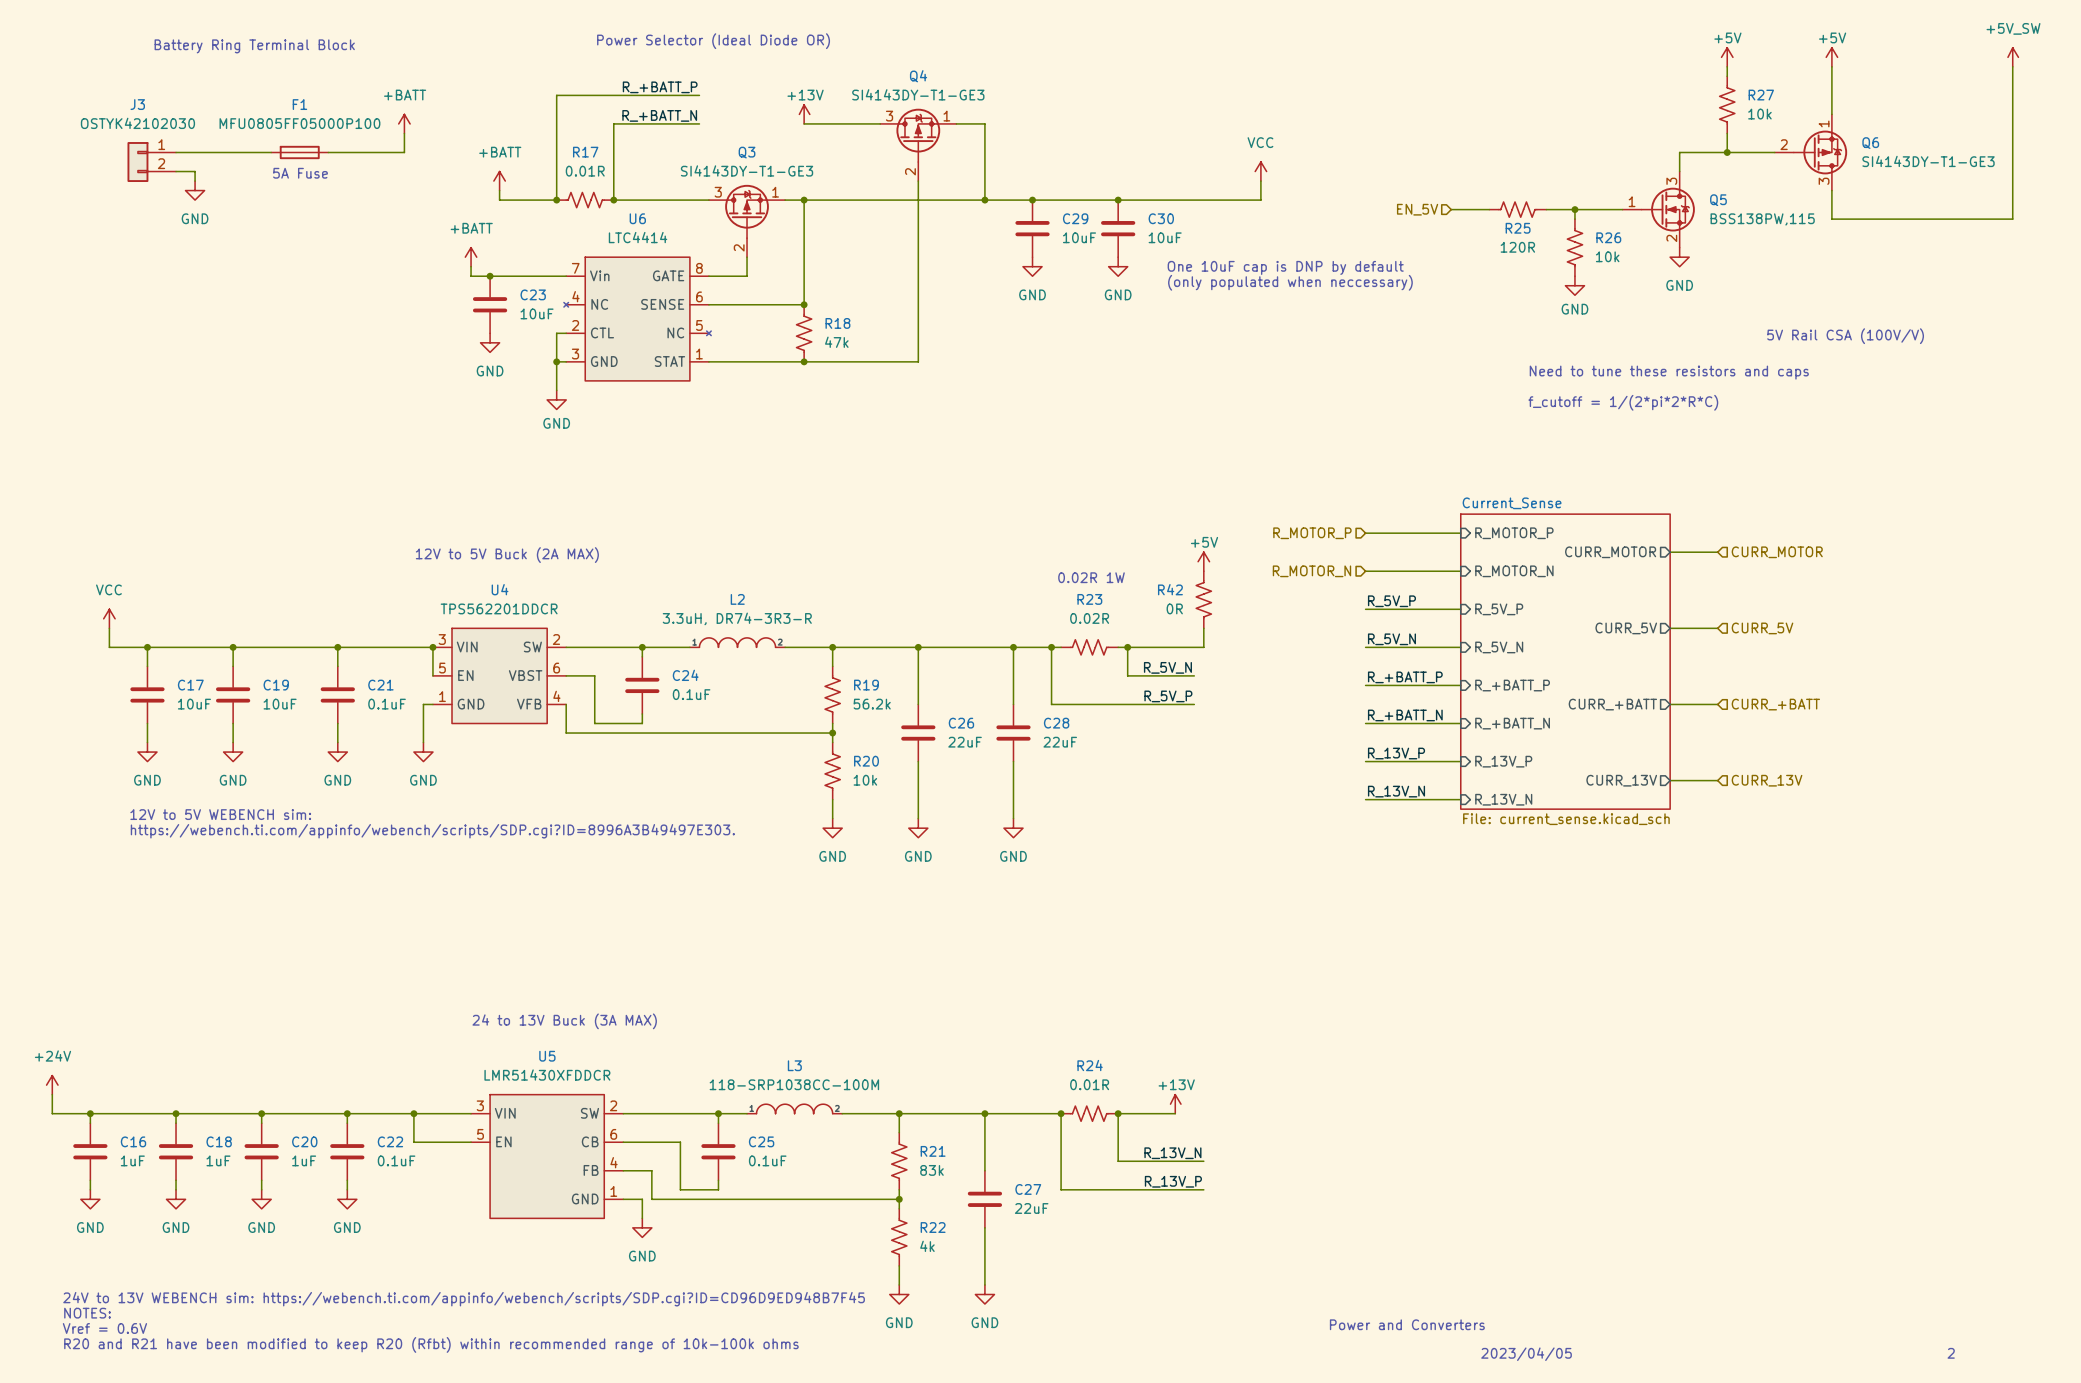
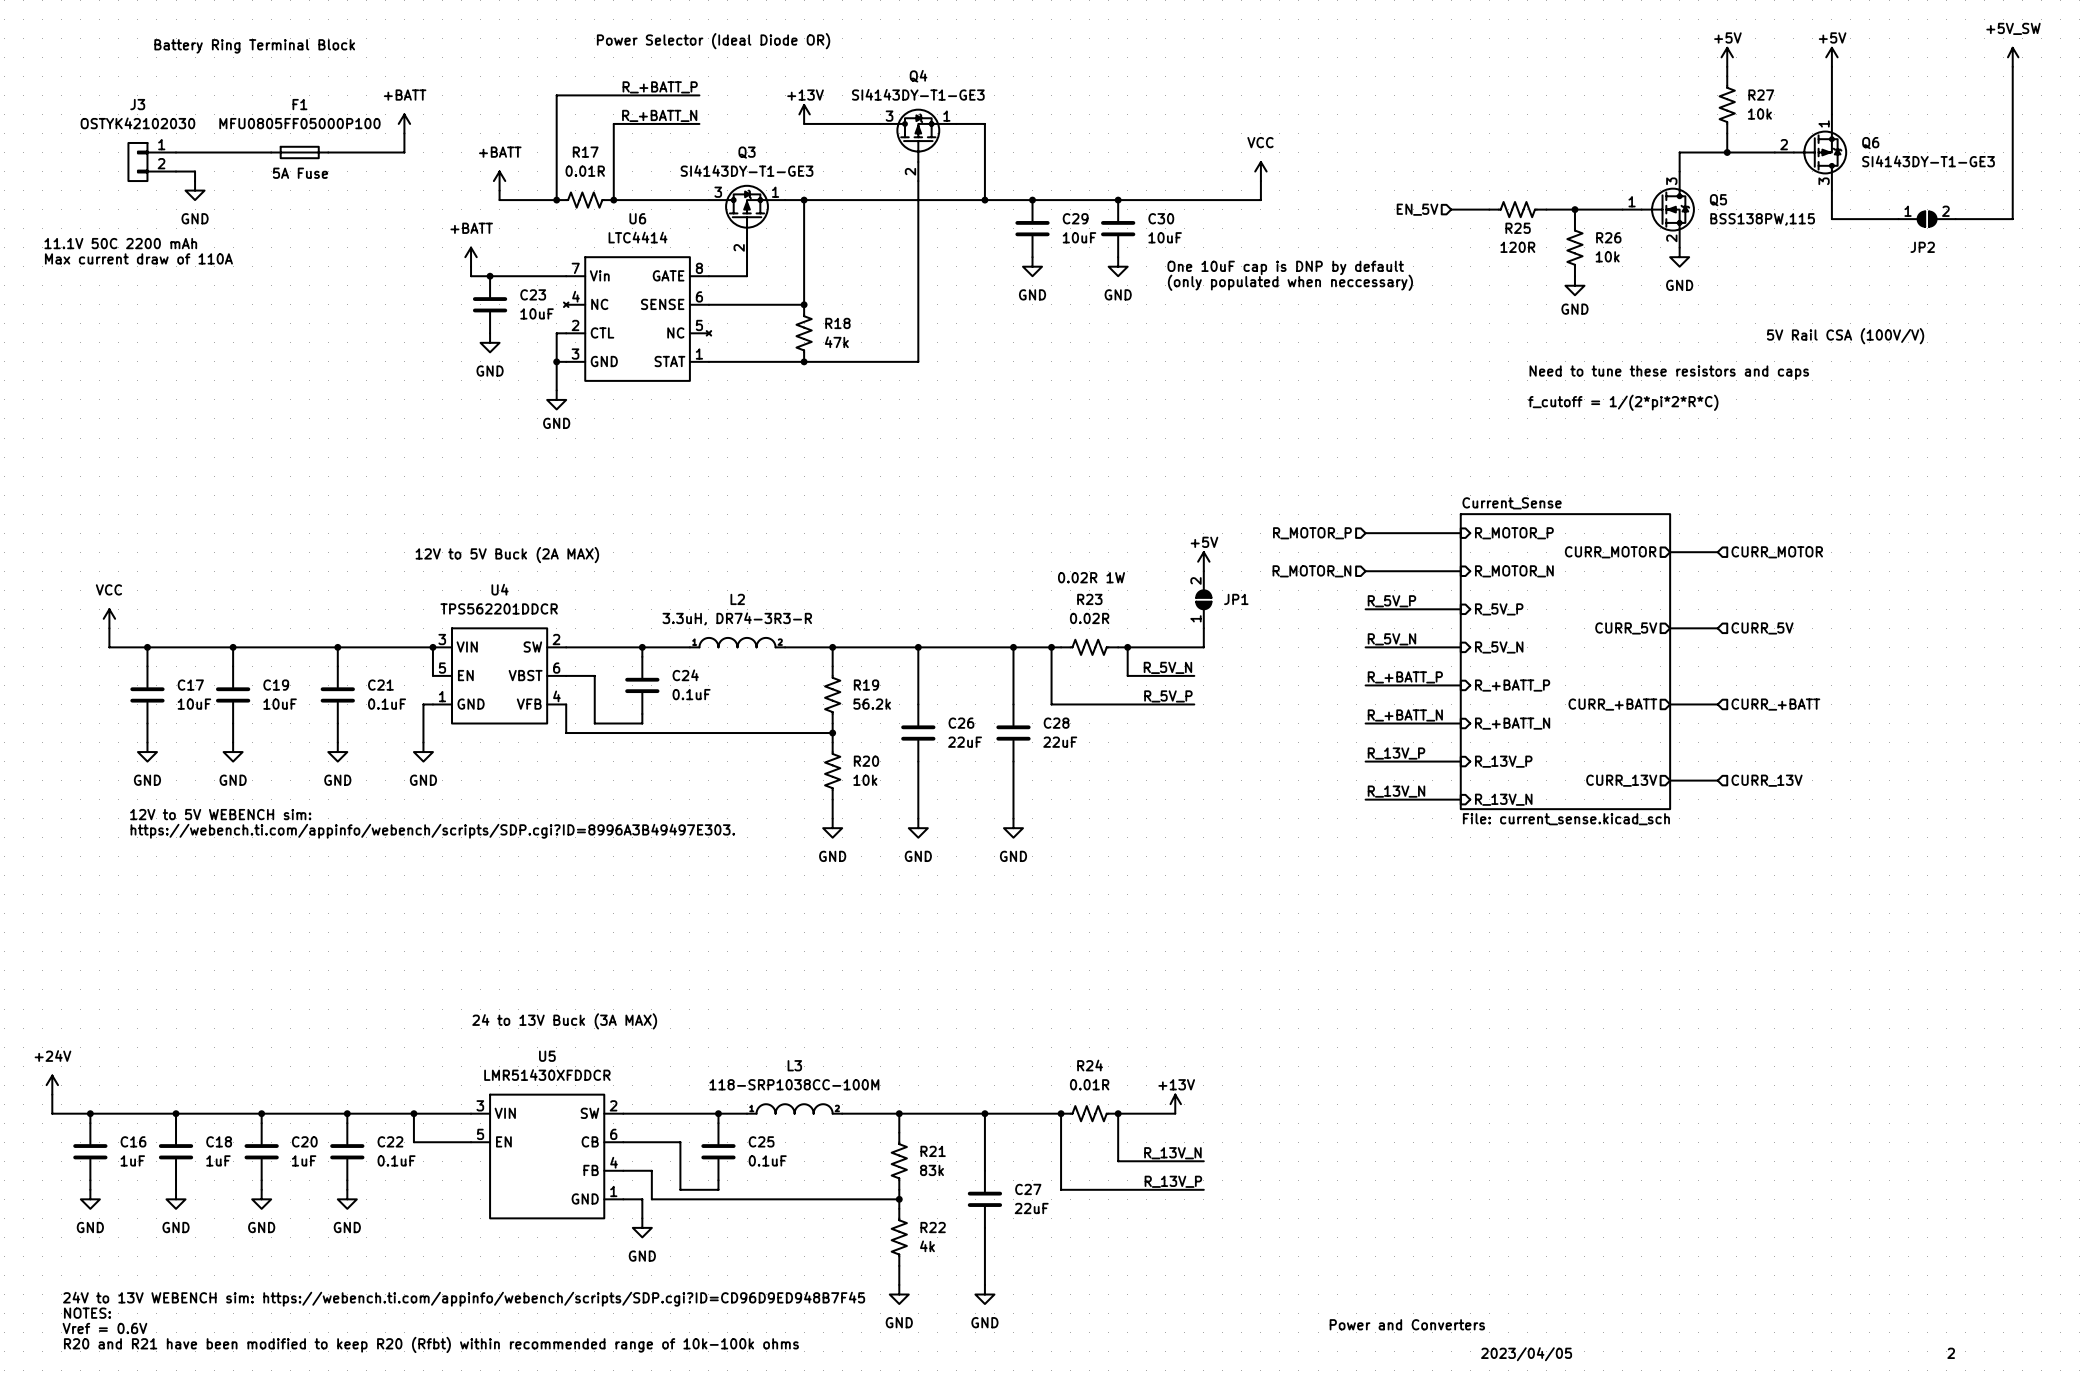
JP2: none -> (1927, 219)
text: none -> 11.1V 50C 2200 mAh (120, 243)
text: none -> Max current draw of 110A (138, 258)
R42: 0R (1203, 599) -> none
JP1: none -> (1203, 599)

